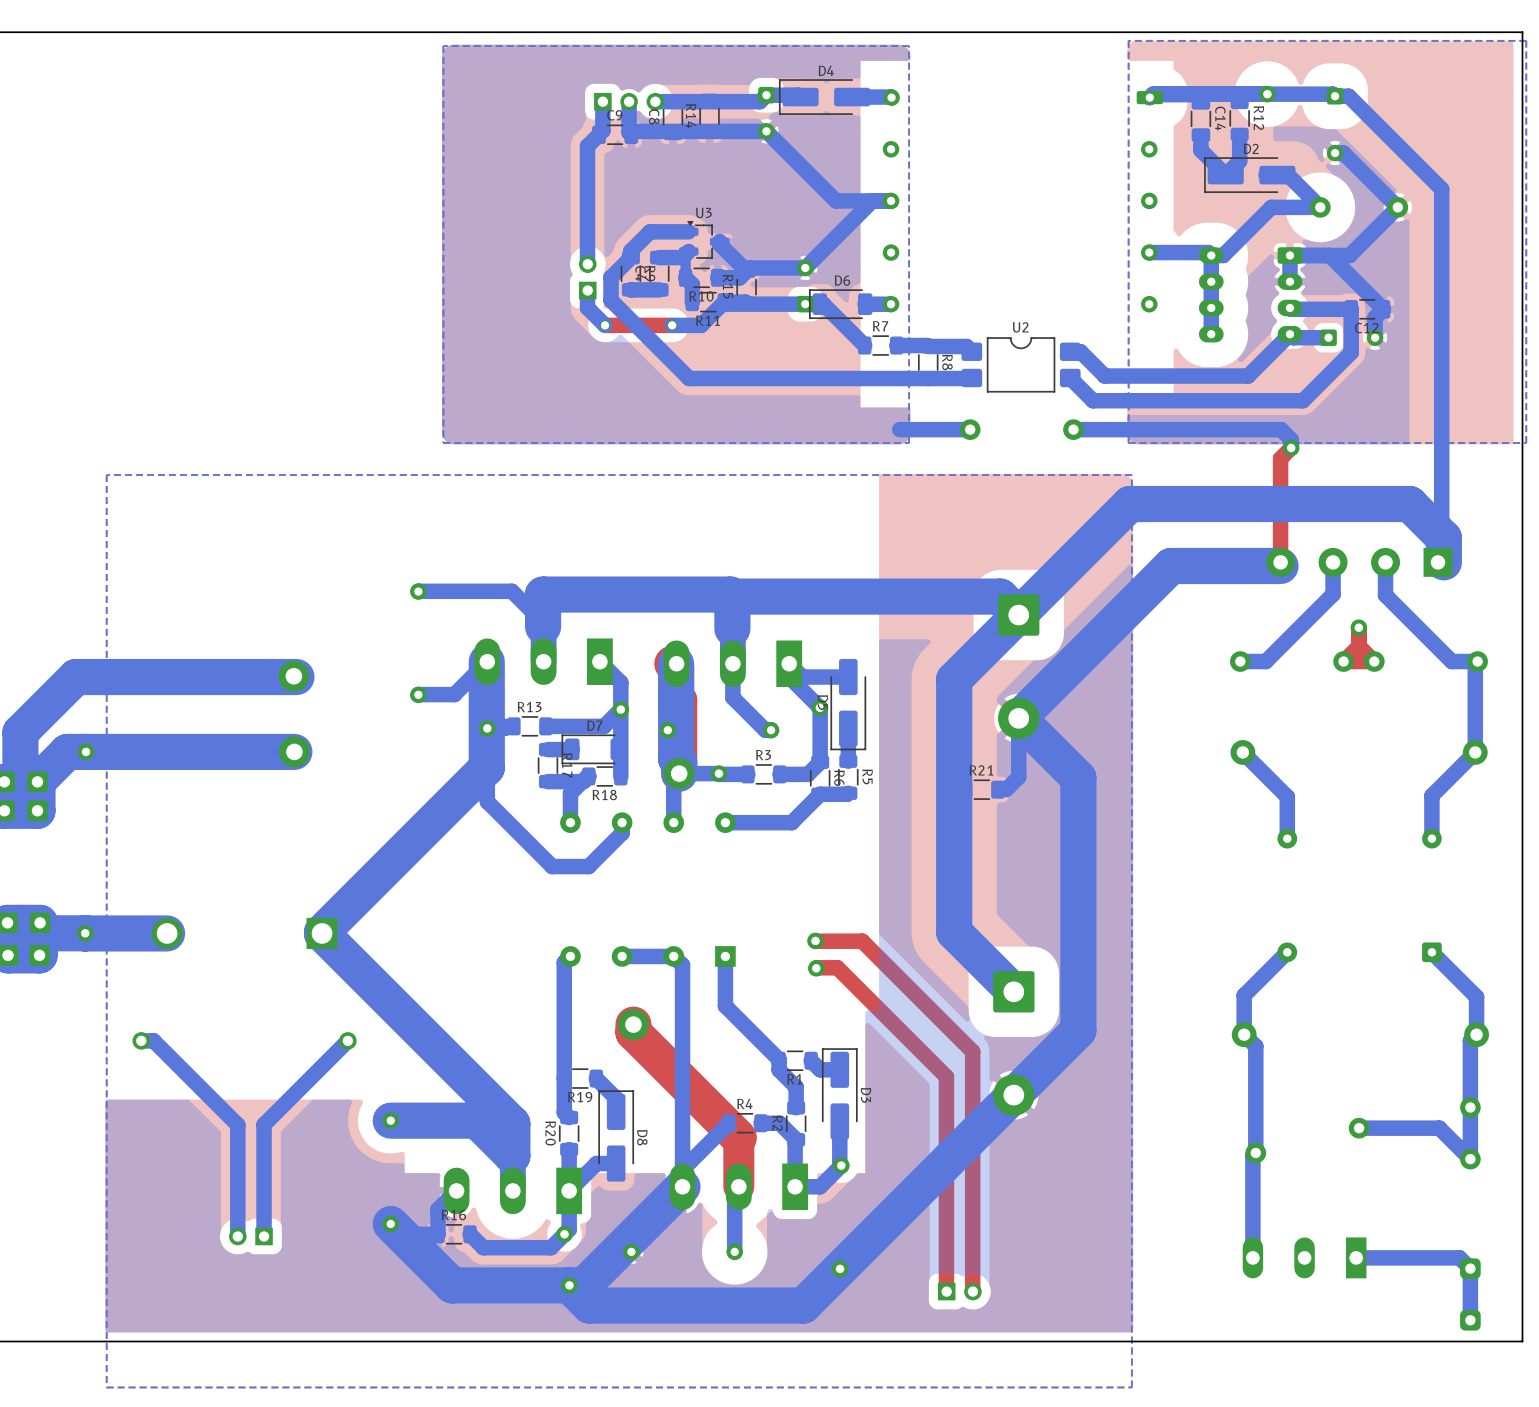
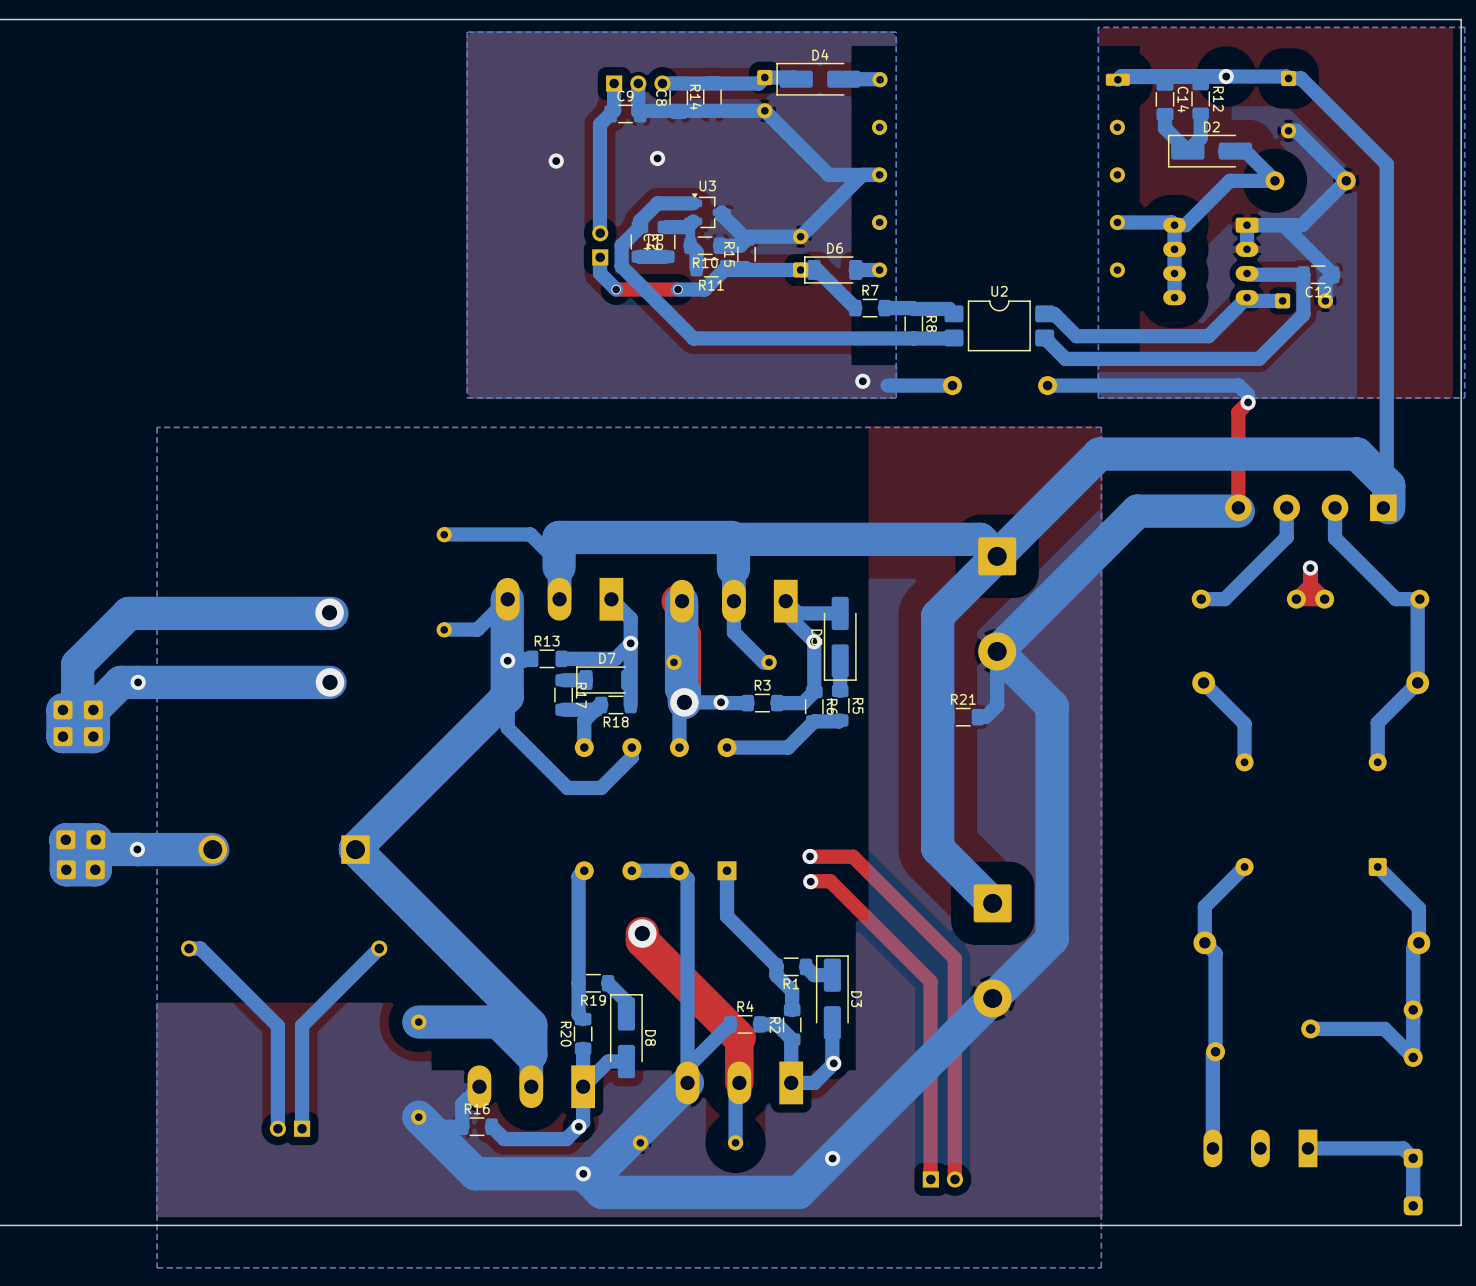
via: none -> (657, 158)
via: none -> (556, 161)
via: none -> (862, 381)

